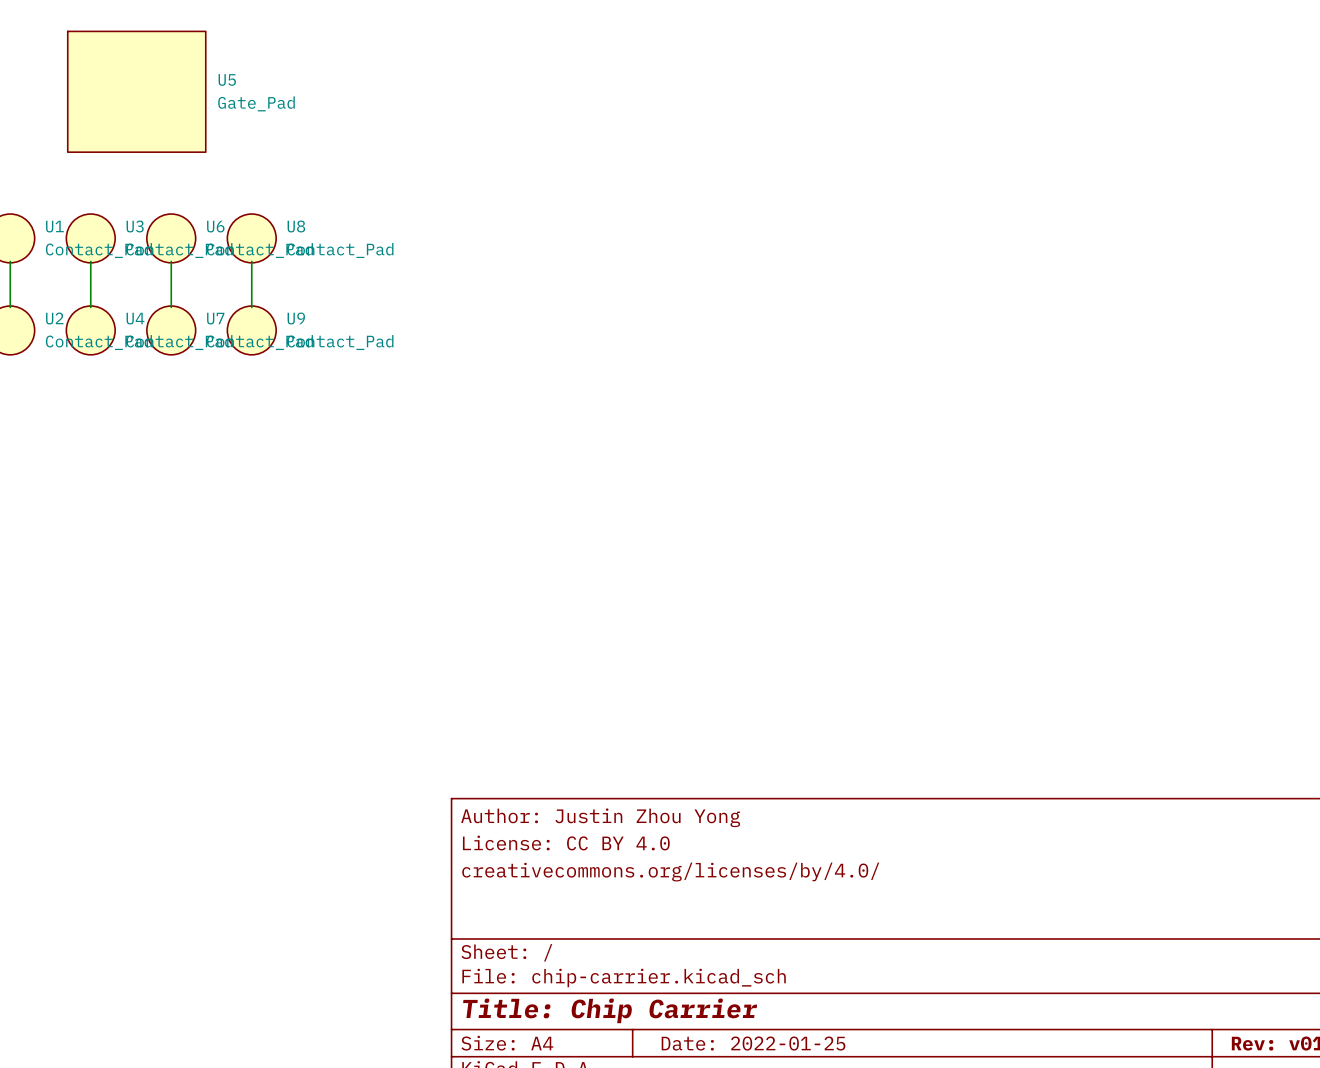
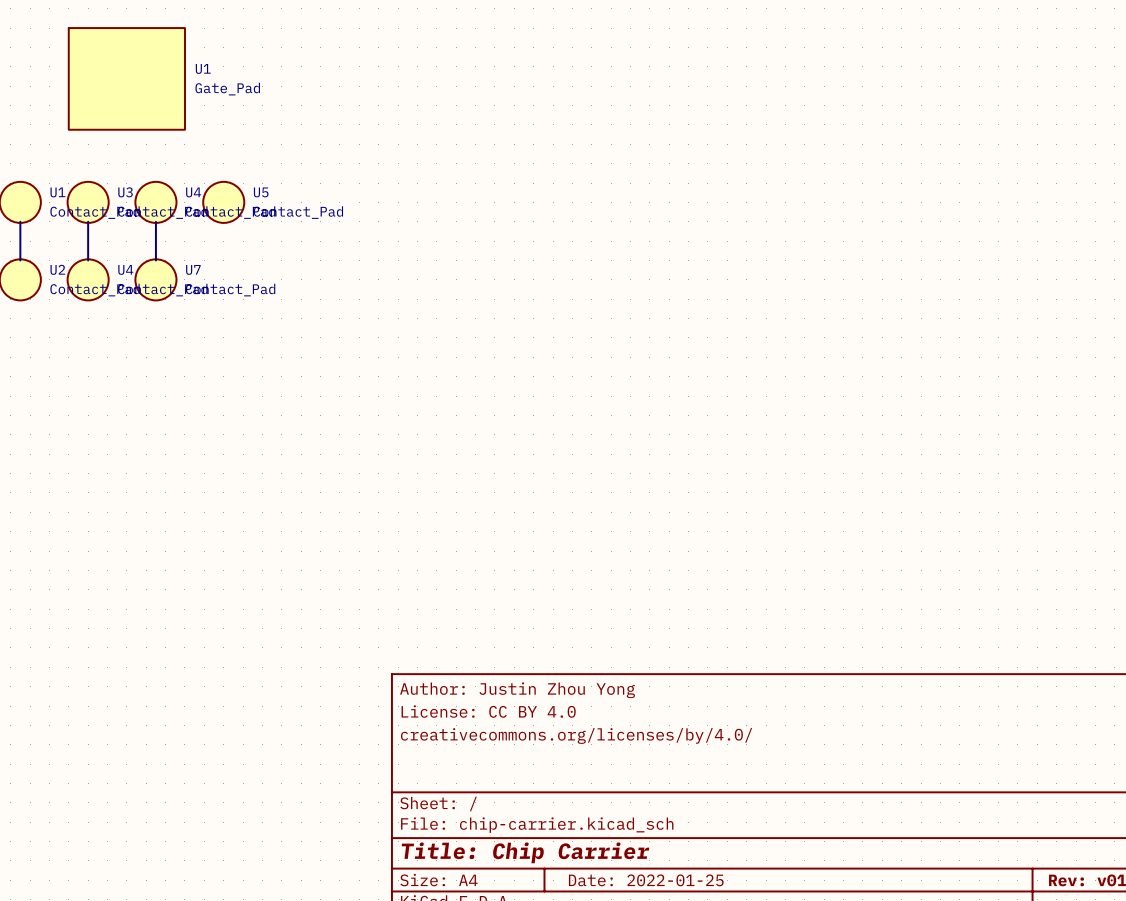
U5 name: U5 (227, 79) -> U1 (203, 68)
U6 name: U6 (215, 226) -> U4 (193, 192)
U8 name: U8 (296, 226) -> U5 (261, 192)
wire: (251, 261) (251, 307) -> none
U9: Contact_Pad (251, 330) -> none

